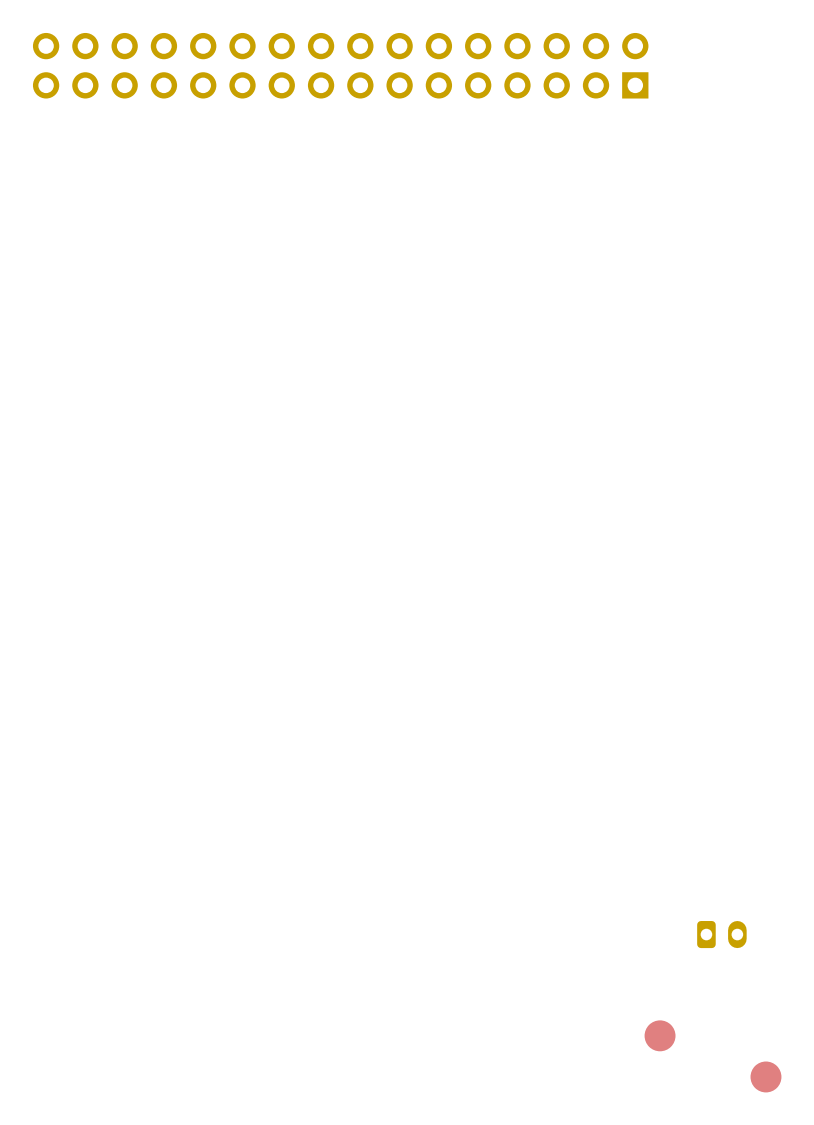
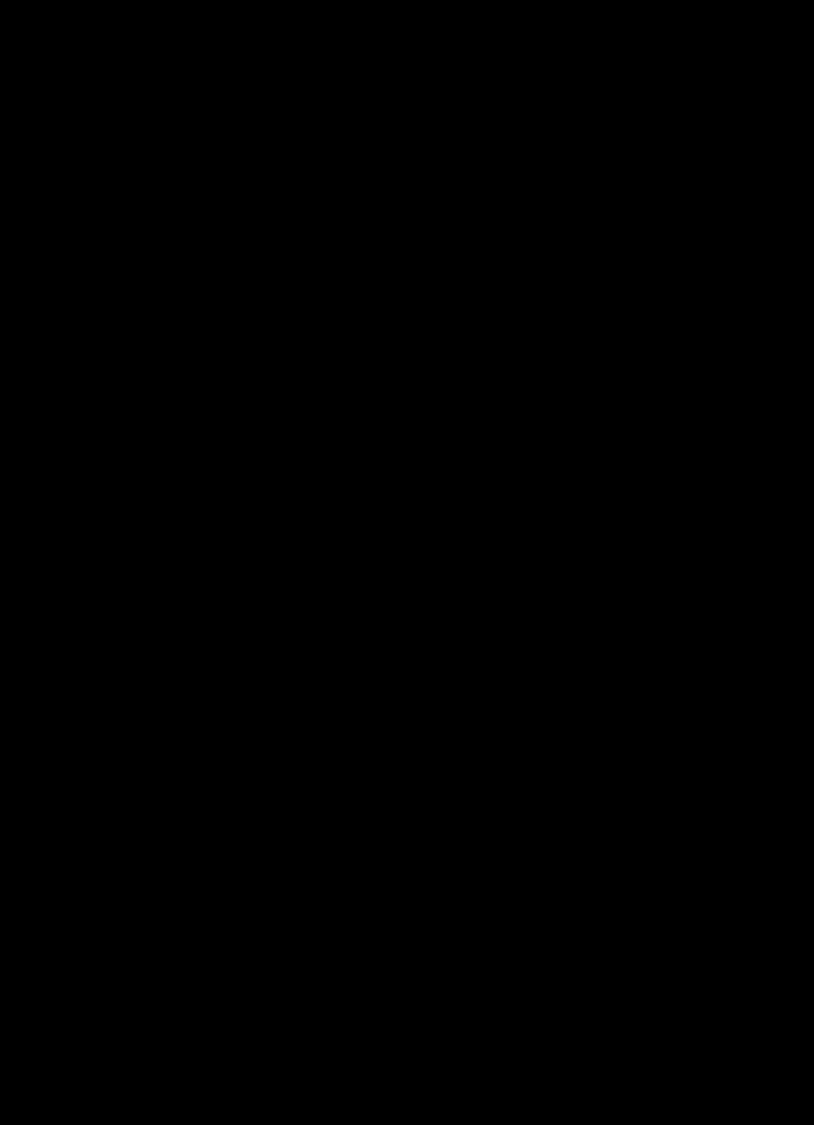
part: (340, 65) -> none
part: (721, 934) -> none
part: (660, 1035) -> none
part: (765, 1076) -> none

